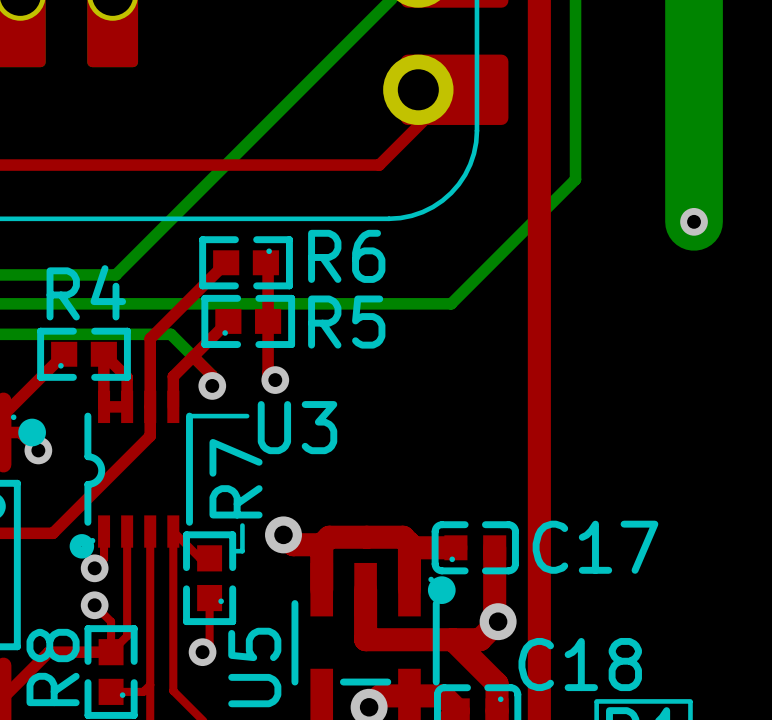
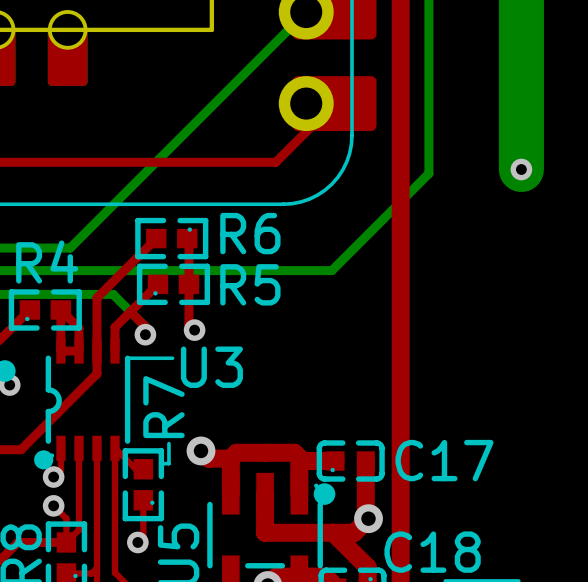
bottom track: (694, 174) (694, 221) -> none
via position: (694, 221) -> (521, 169)

